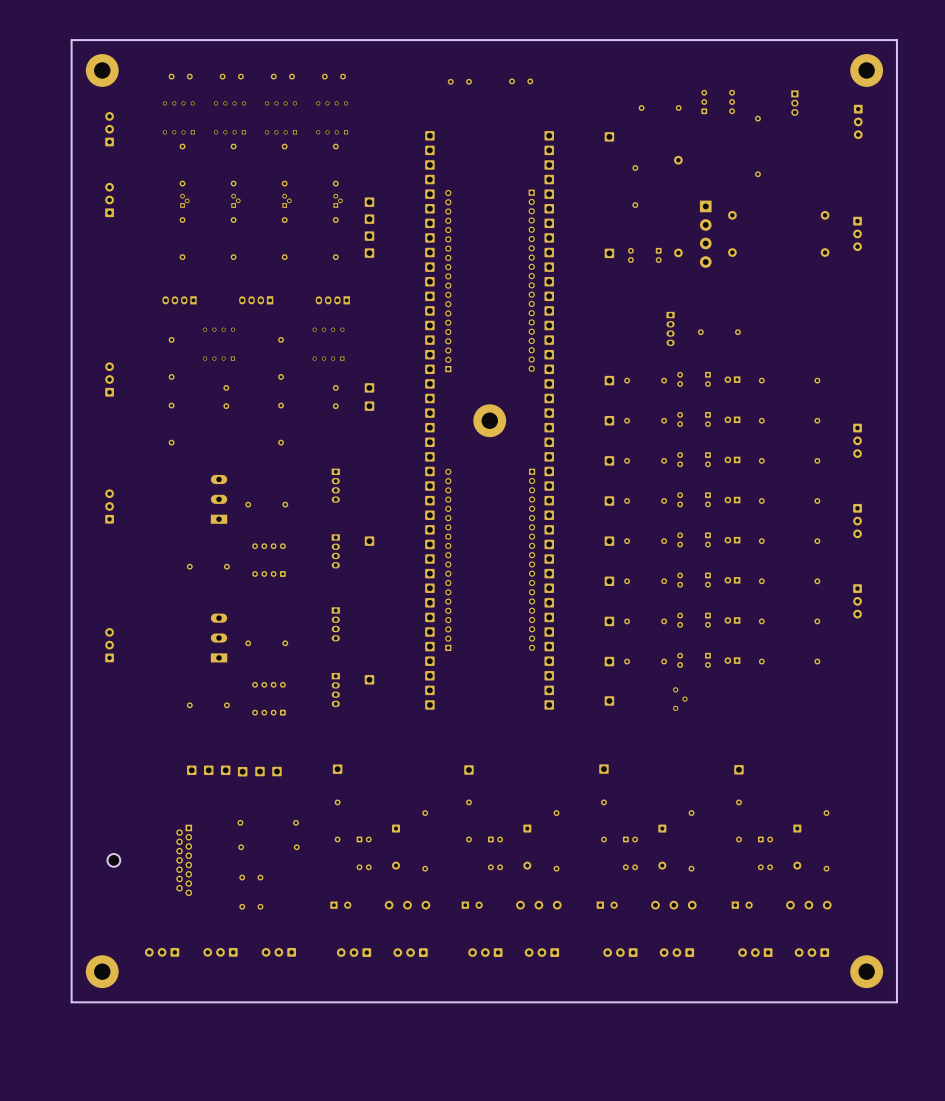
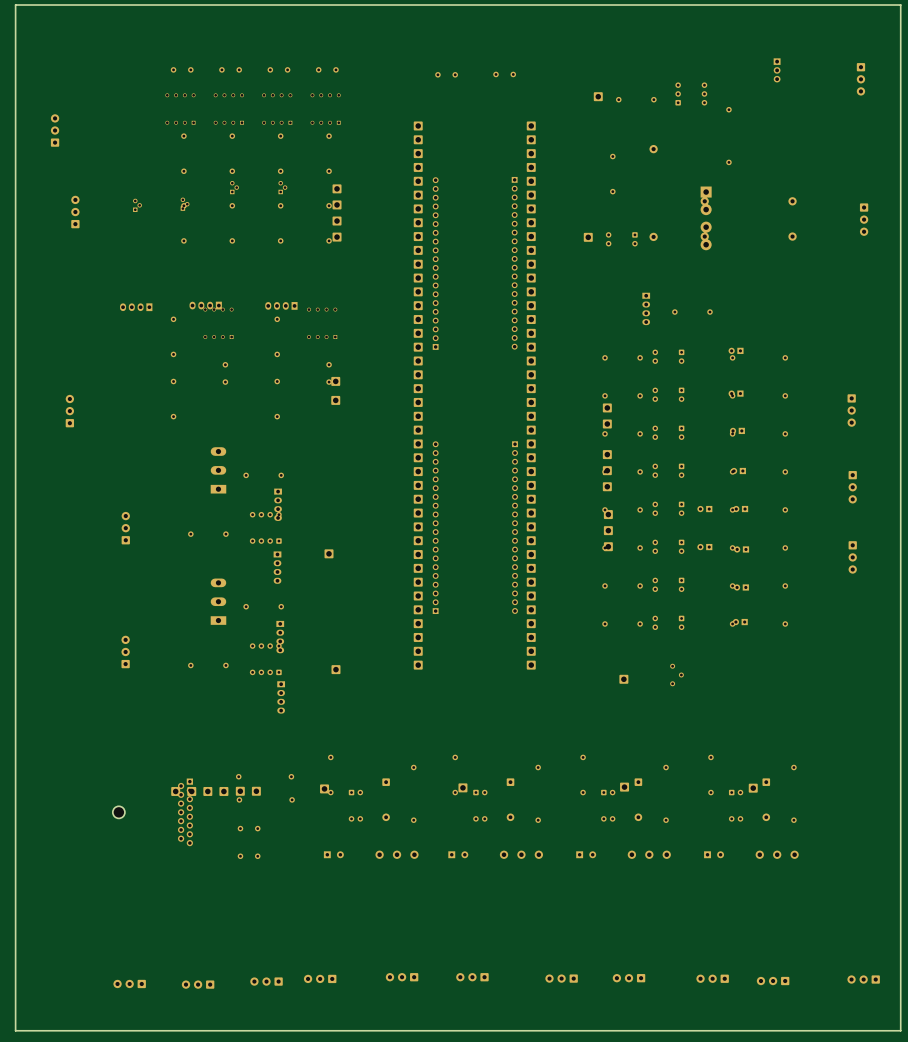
board edge: (896, 40) (71, 40) (71, 1002) (896, 1002) (896, 40) -> (900, 5) (900, 1030) (15, 1030) (15, 5) (900, 5)
part: (102, 70) -> none
part: (866, 70) -> none
part position: (794, 103) -> (777, 70)
part position: (858, 121) -> (860, 79)
part: (109, 129) -> none
part position: (609, 136) -> (598, 96)
part: none -> (55, 130)
part: (109, 199) -> none
part position: (184, 200) -> (185, 204)
part: (338, 200) -> none
part: none -> (337, 188)
part: (369, 202) -> none
part: none -> (137, 205)
part: none -> (337, 204)
part: (369, 219) -> none
part: none -> (75, 212)
part position: (857, 233) -> (864, 219)
part position: (705, 234) -> (706, 218)
part: none -> (337, 221)
part: (369, 236) -> none
part: none -> (337, 237)
part: (369, 253) -> none
part: (179, 300) -> none
part: (256, 300) -> none
part: (332, 300) -> none
part: none -> (205, 305)
part: none -> (281, 305)
part: none -> (136, 307)
part: none -> (736, 350)
part: (109, 379) -> none
part: (732, 379) -> none
part: (609, 380) -> none
part: (369, 387) -> none
part: none -> (335, 381)
part: (369, 406) -> none
part: none -> (736, 393)
part: (732, 419) -> none
part: (489, 420) -> none
part: (609, 420) -> none
part: none -> (335, 400)
part: none -> (607, 407)
part: none -> (69, 411)
part position: (857, 440) -> (851, 410)
part: none -> (607, 424)
part: none -> (737, 430)
part: (732, 459) -> none
part: (609, 460) -> none
part: none -> (607, 454)
part: (335, 485) -> none
part: none -> (607, 470)
part: (732, 500) -> none
part: none -> (738, 471)
part: (609, 501) -> none
part: (109, 506) -> none
part: none -> (607, 486)
part position: (857, 521) -> (852, 487)
part: none -> (278, 504)
part: none -> (740, 509)
part: (369, 541) -> none
part: (609, 541) -> none
part: none -> (608, 514)
part: (335, 551) -> none
part: none -> (125, 528)
part: none -> (608, 530)
part: none -> (608, 546)
part: (609, 581) -> none
part: none -> (741, 549)
part: none -> (329, 553)
part position: (857, 601) -> (852, 557)
part: none -> (277, 567)
part: (732, 620) -> none
part: (609, 621) -> none
part: none -> (741, 587)
part: (335, 624) -> none
part: (109, 645) -> none
part: none -> (740, 622)
part: (732, 660) -> none
part: (609, 661) -> none
part: none -> (280, 637)
part: (369, 679) -> none
part: (335, 690) -> none
part: none -> (125, 651)
part position: (680, 699) -> (677, 675)
part: (609, 700) -> none
part: none -> (335, 669)
part: none -> (623, 679)
part: none -> (281, 697)
part: (337, 769) -> none
part: (603, 769) -> none
part: (738, 769) -> none
part: (191, 770) -> none
part: (208, 770) -> none
part: (225, 770) -> none
part position: (468, 770) -> (462, 787)
part: (242, 771) -> none
part: (259, 771) -> none
part: (276, 771) -> none
part: none -> (624, 787)
part: none -> (753, 788)
part: none -> (324, 788)
part: none -> (175, 791)
part: none -> (191, 791)
part: none -> (207, 791)
part: none -> (223, 791)
part: none -> (240, 791)
part: none -> (256, 791)
part: (162, 952) -> none
part: (220, 952) -> none
part: (278, 952) -> none
part: (354, 952) -> none
part: (410, 952) -> none
part: (485, 952) -> none
part: (541, 952) -> none
part: (620, 952) -> none
part: (676, 952) -> none
part: (755, 952) -> none
part: (811, 952) -> none
part: (102, 971) -> none
part: (866, 971) -> none
part: none -> (402, 977)
part: none -> (472, 977)
part: none -> (561, 978)
part: none -> (628, 978)
part: none -> (320, 978)
part: none -> (712, 978)
part: none -> (863, 979)
part: none -> (773, 981)
part: none -> (266, 981)
part: none -> (129, 983)
part: none -> (198, 984)

